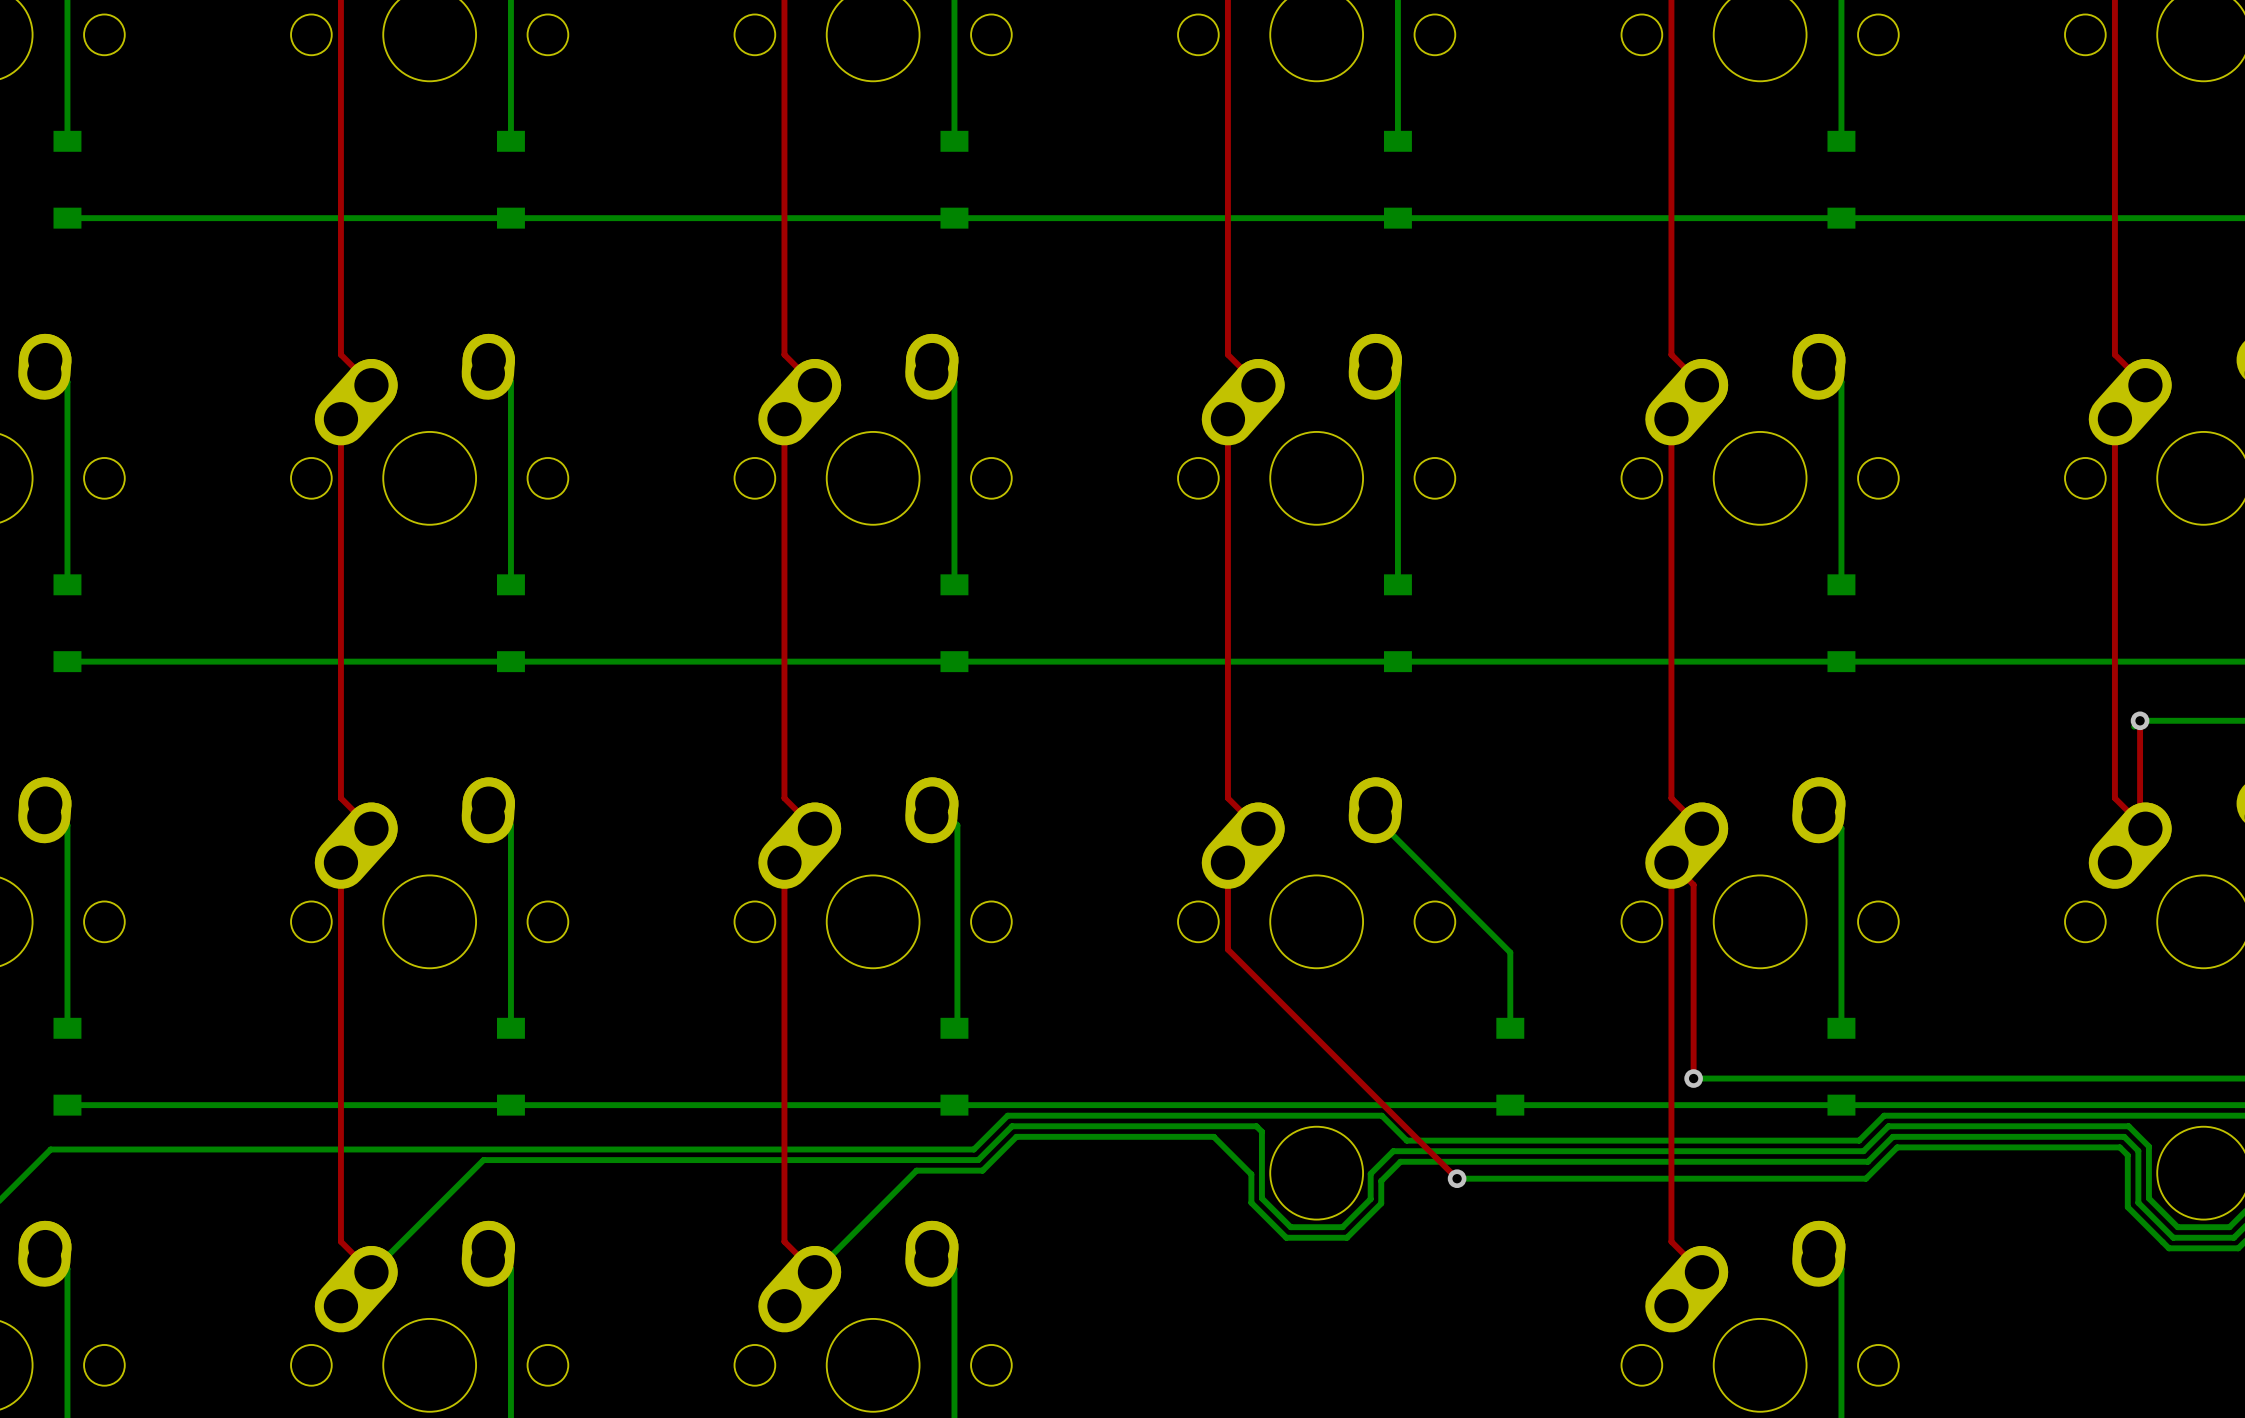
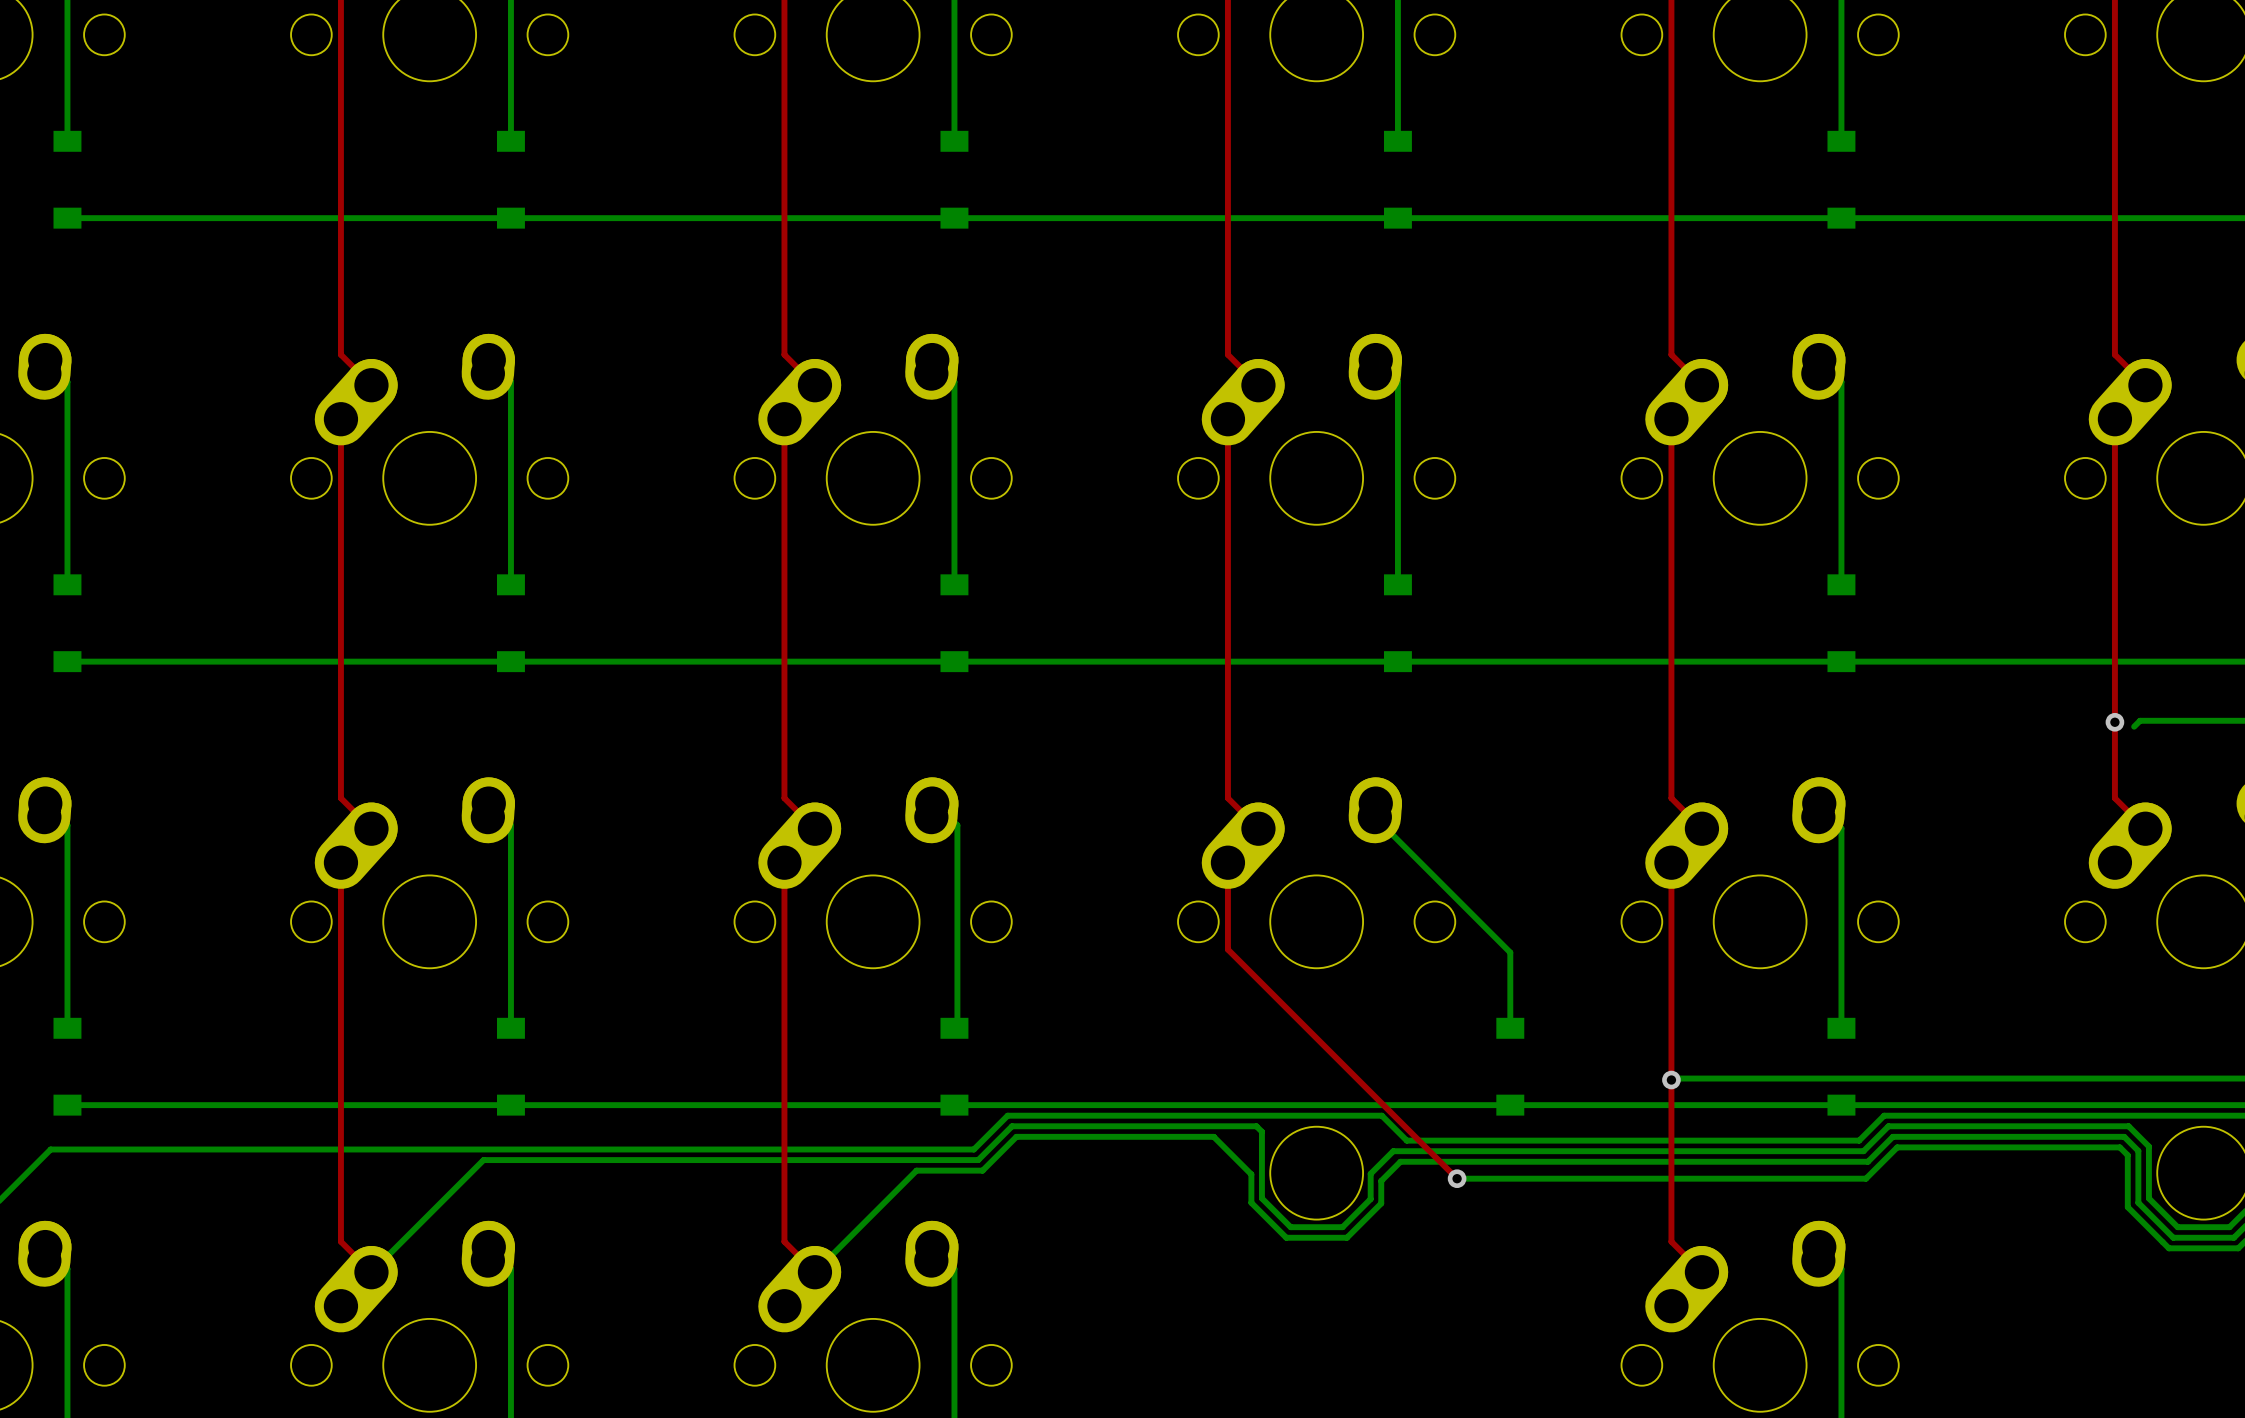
top track: (2140, 720) (2140, 823) -> none
via position: (2140, 720) -> (2114, 722)
top track: (1671, 862) (1693, 884) (1693, 1078) -> none
bottom track: none -> (1693, 1078) (1671, 1080)
via position: (1693, 1078) -> (1671, 1080)

